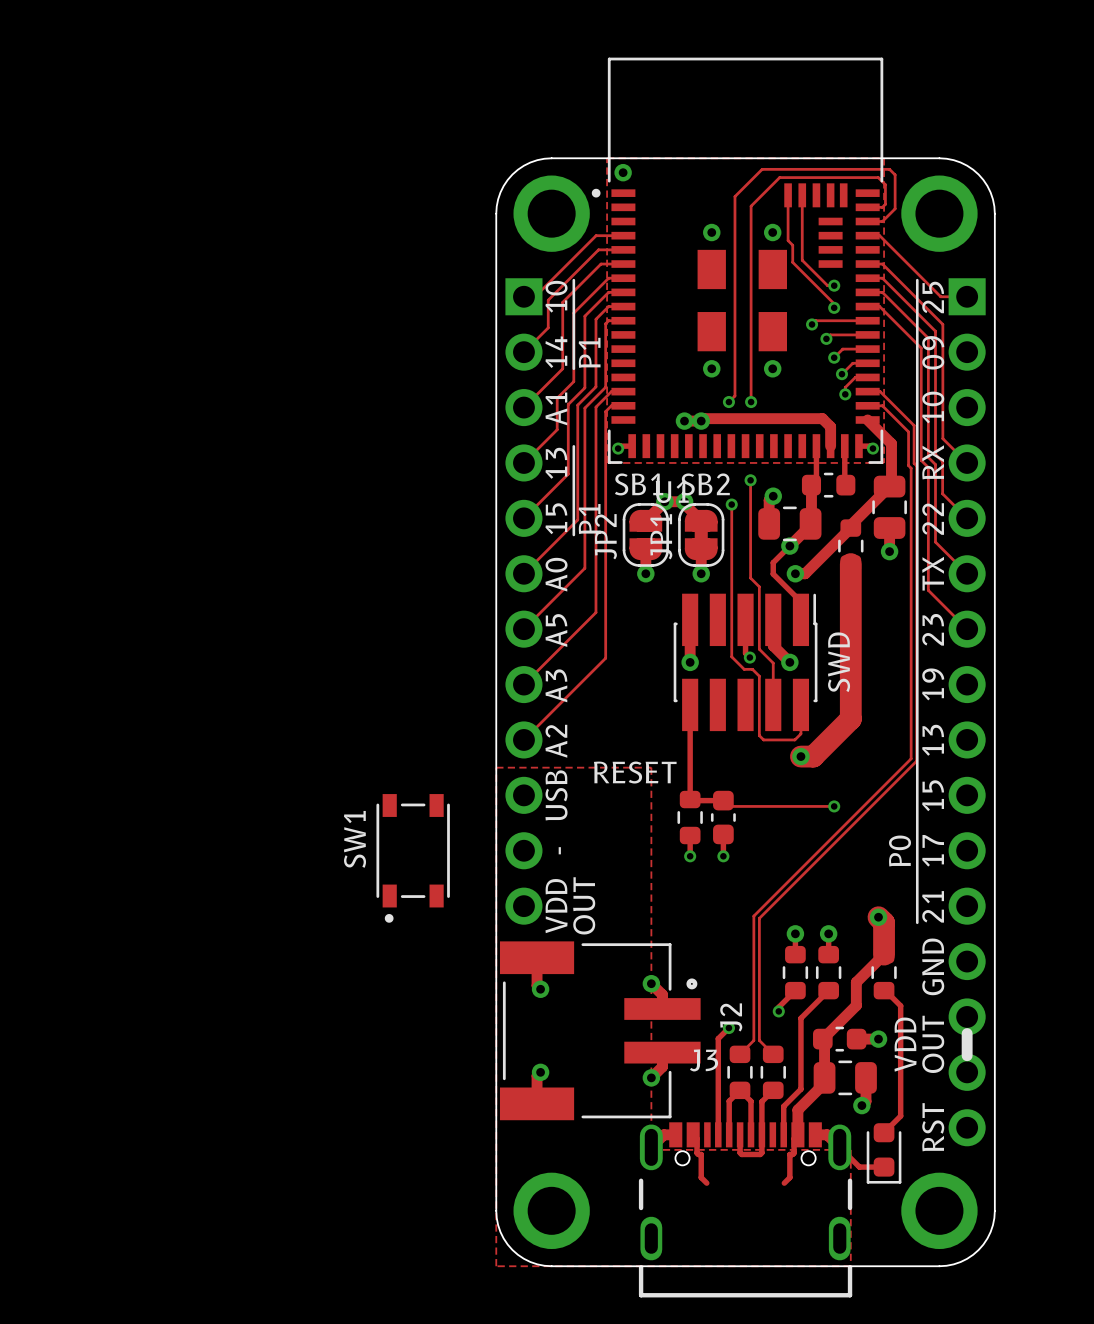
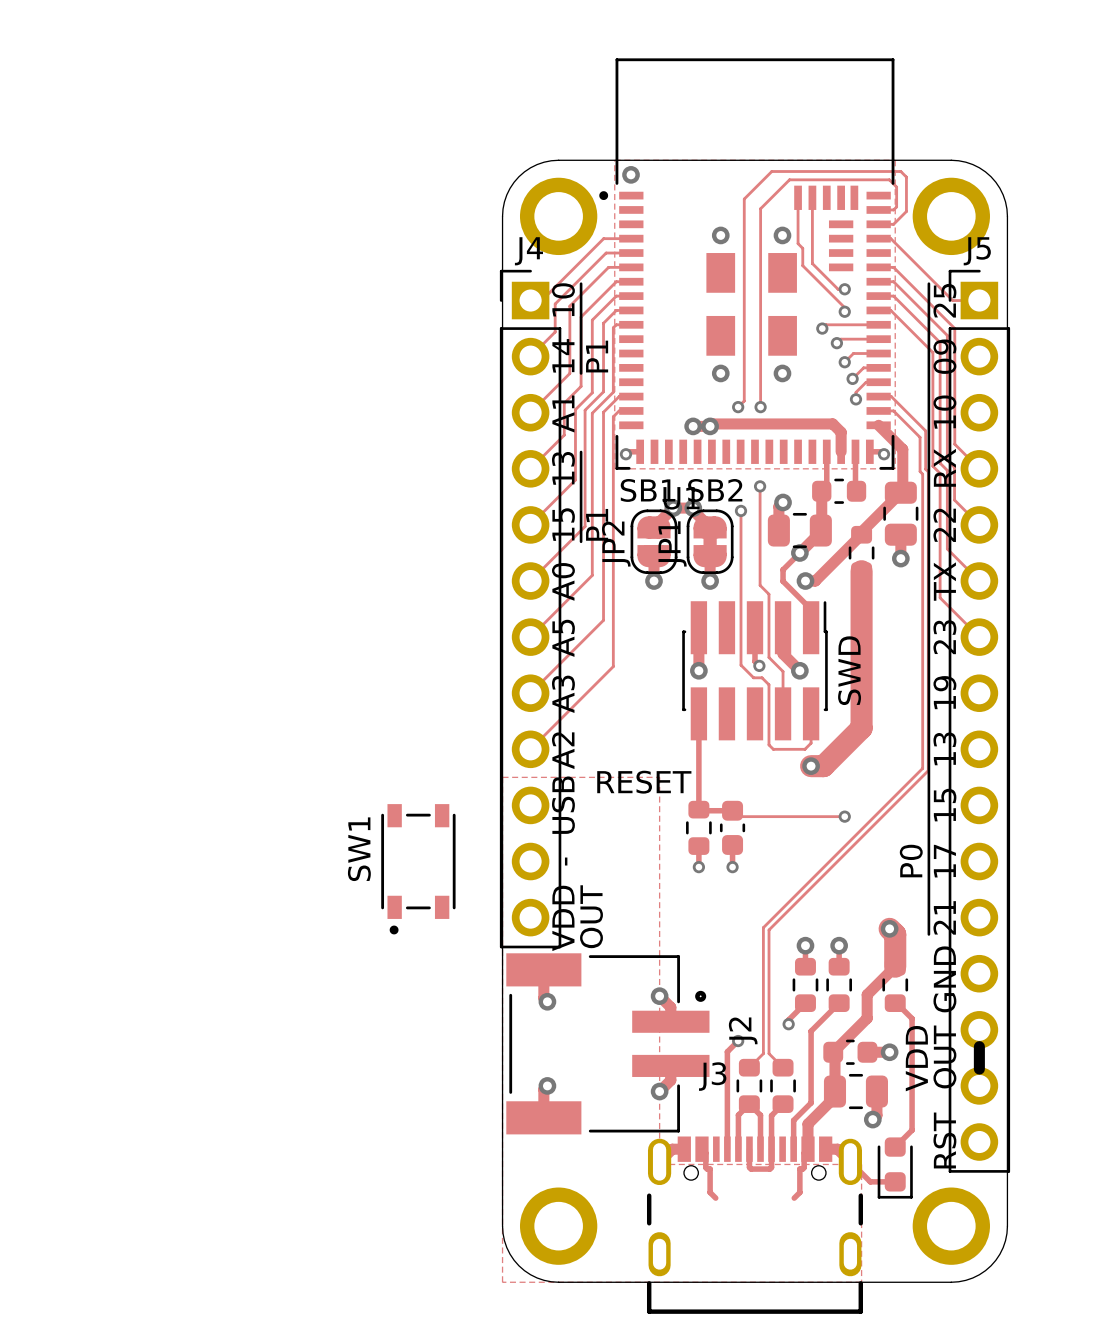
J4: none -> (530, 609)
J5: none -> (979, 721)

